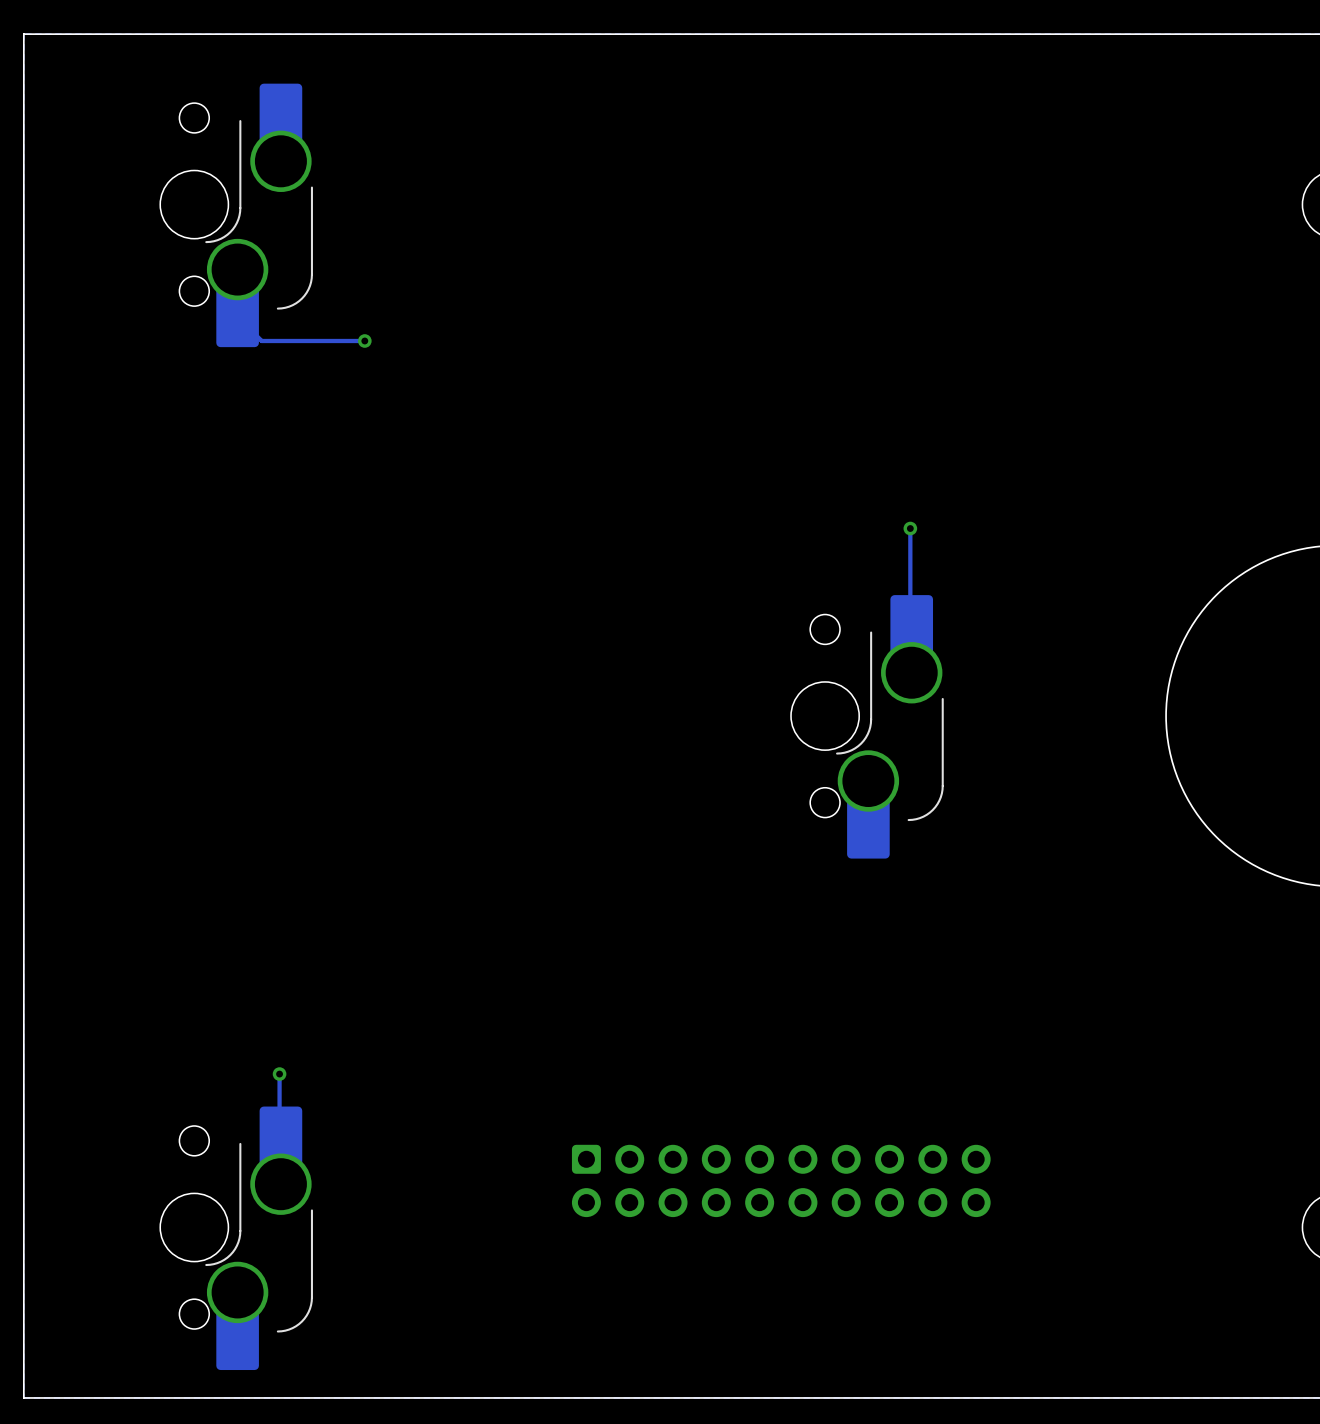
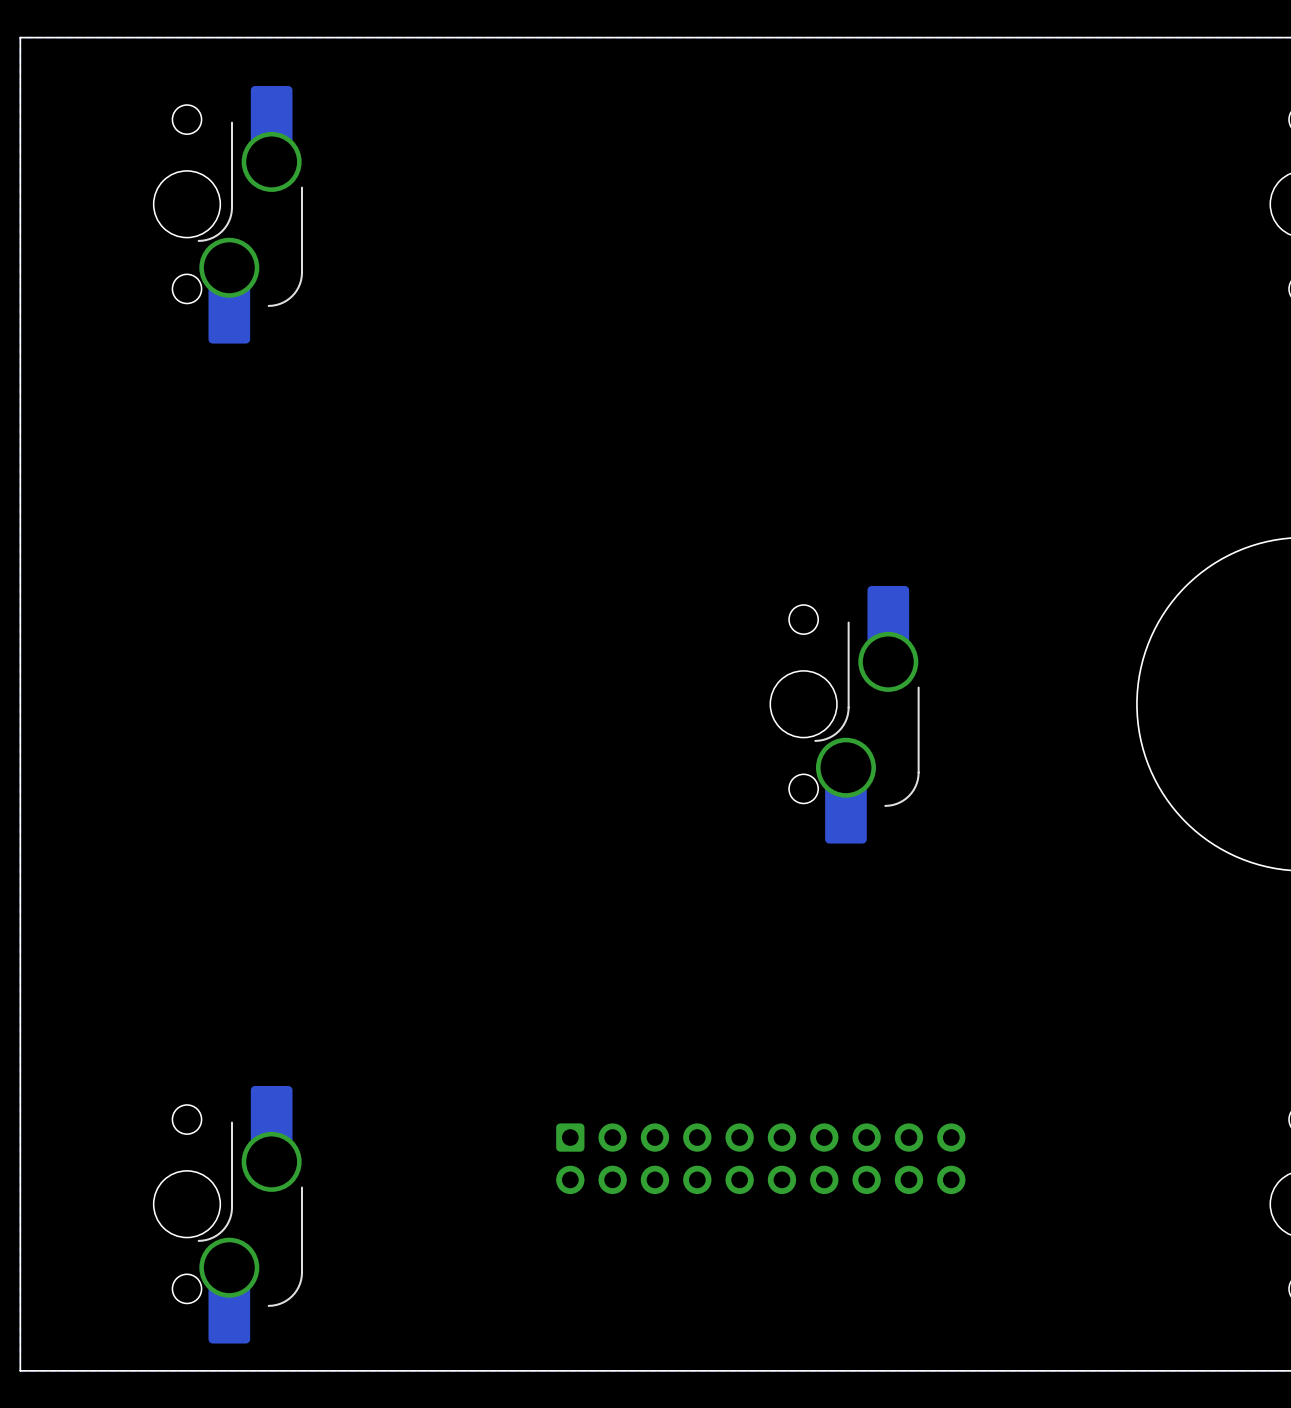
track: (237, 316) (261, 340) (364, 340) -> none
via: (364, 340) -> none
track: (910, 528) (911, 625) -> none
via: (910, 528) -> none
track: (279, 1074) (280, 1136) -> none
via: (279, 1074) -> none

